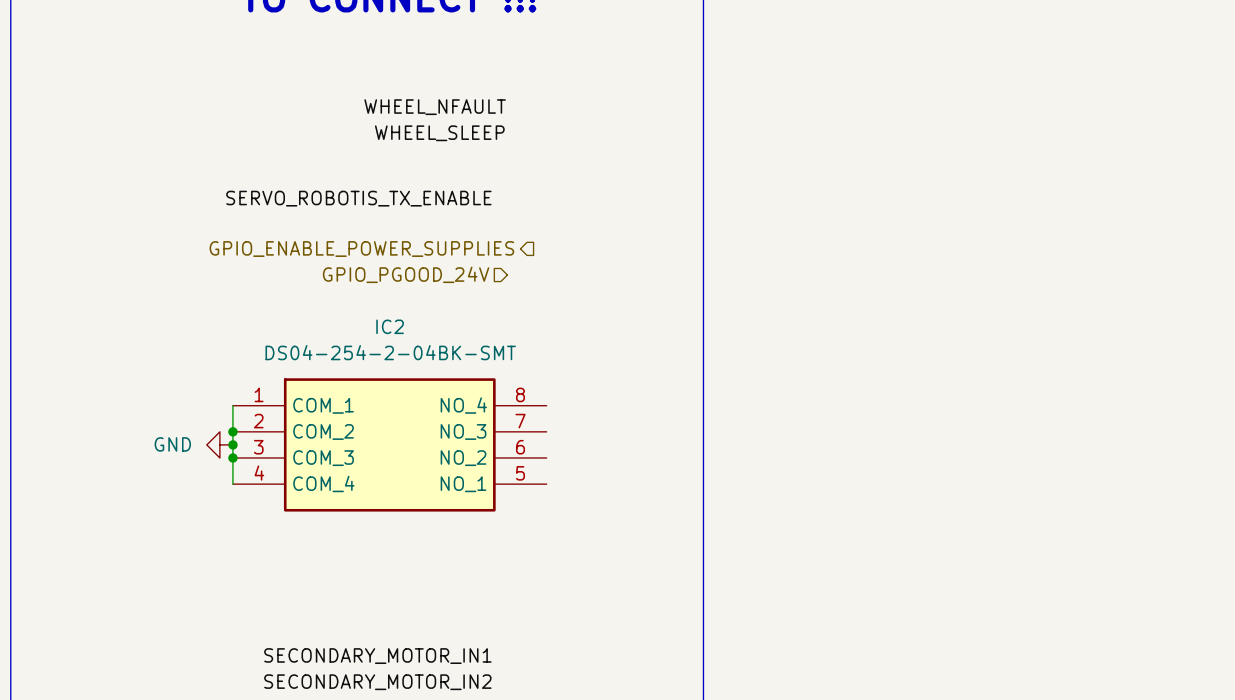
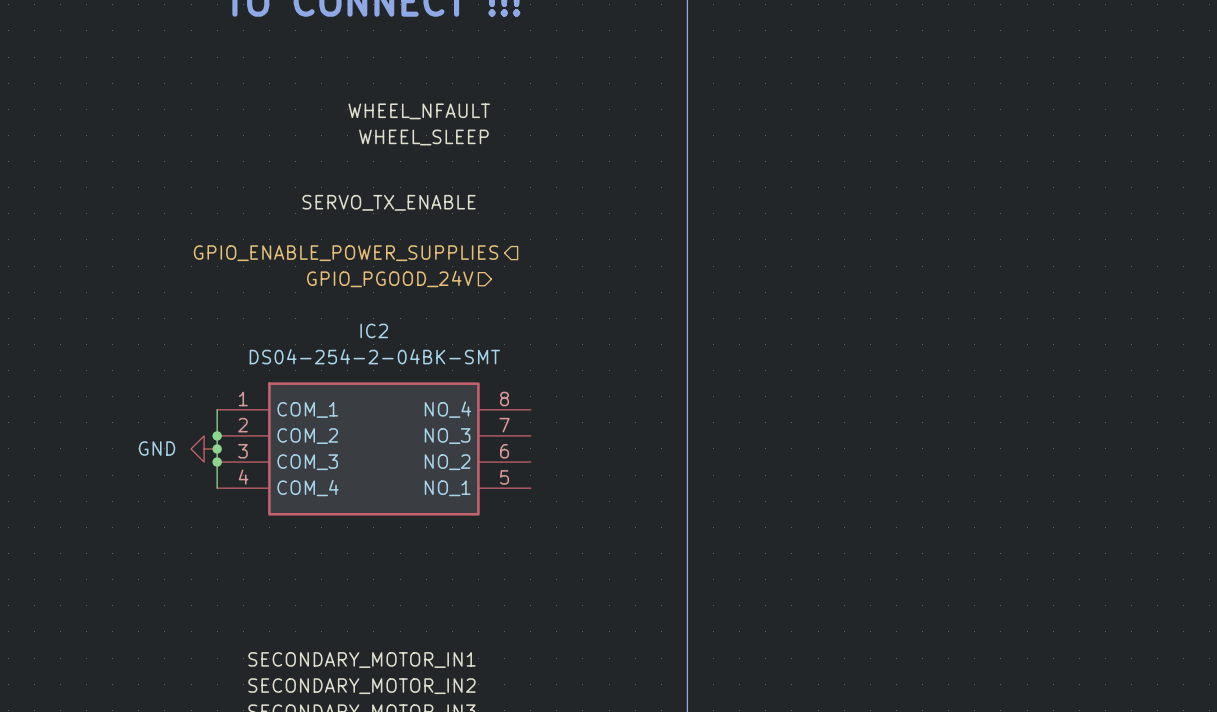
label: SERVO_ROBOTIS_TX_ENABLE (358, 198) -> SERVO_TX_ENABLE (389, 202)

